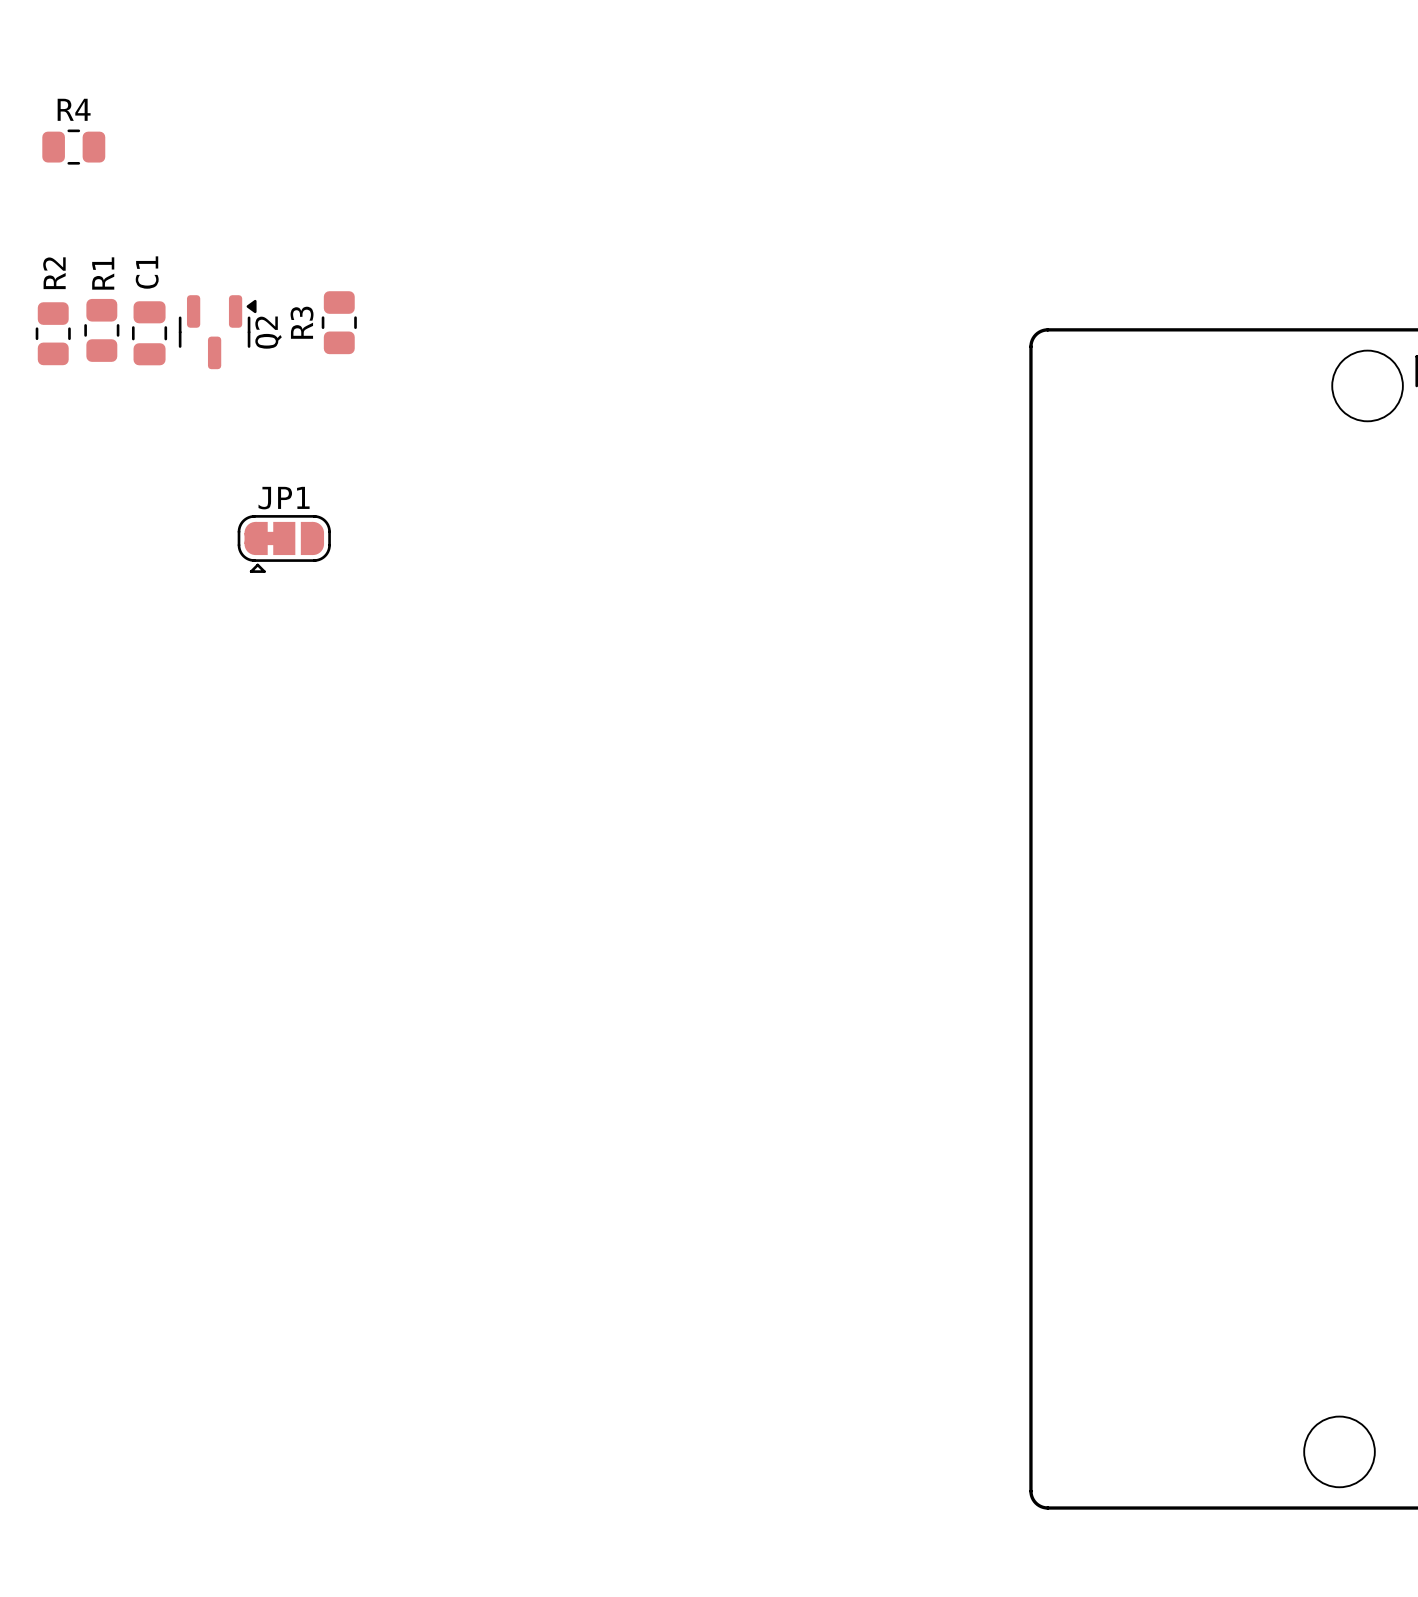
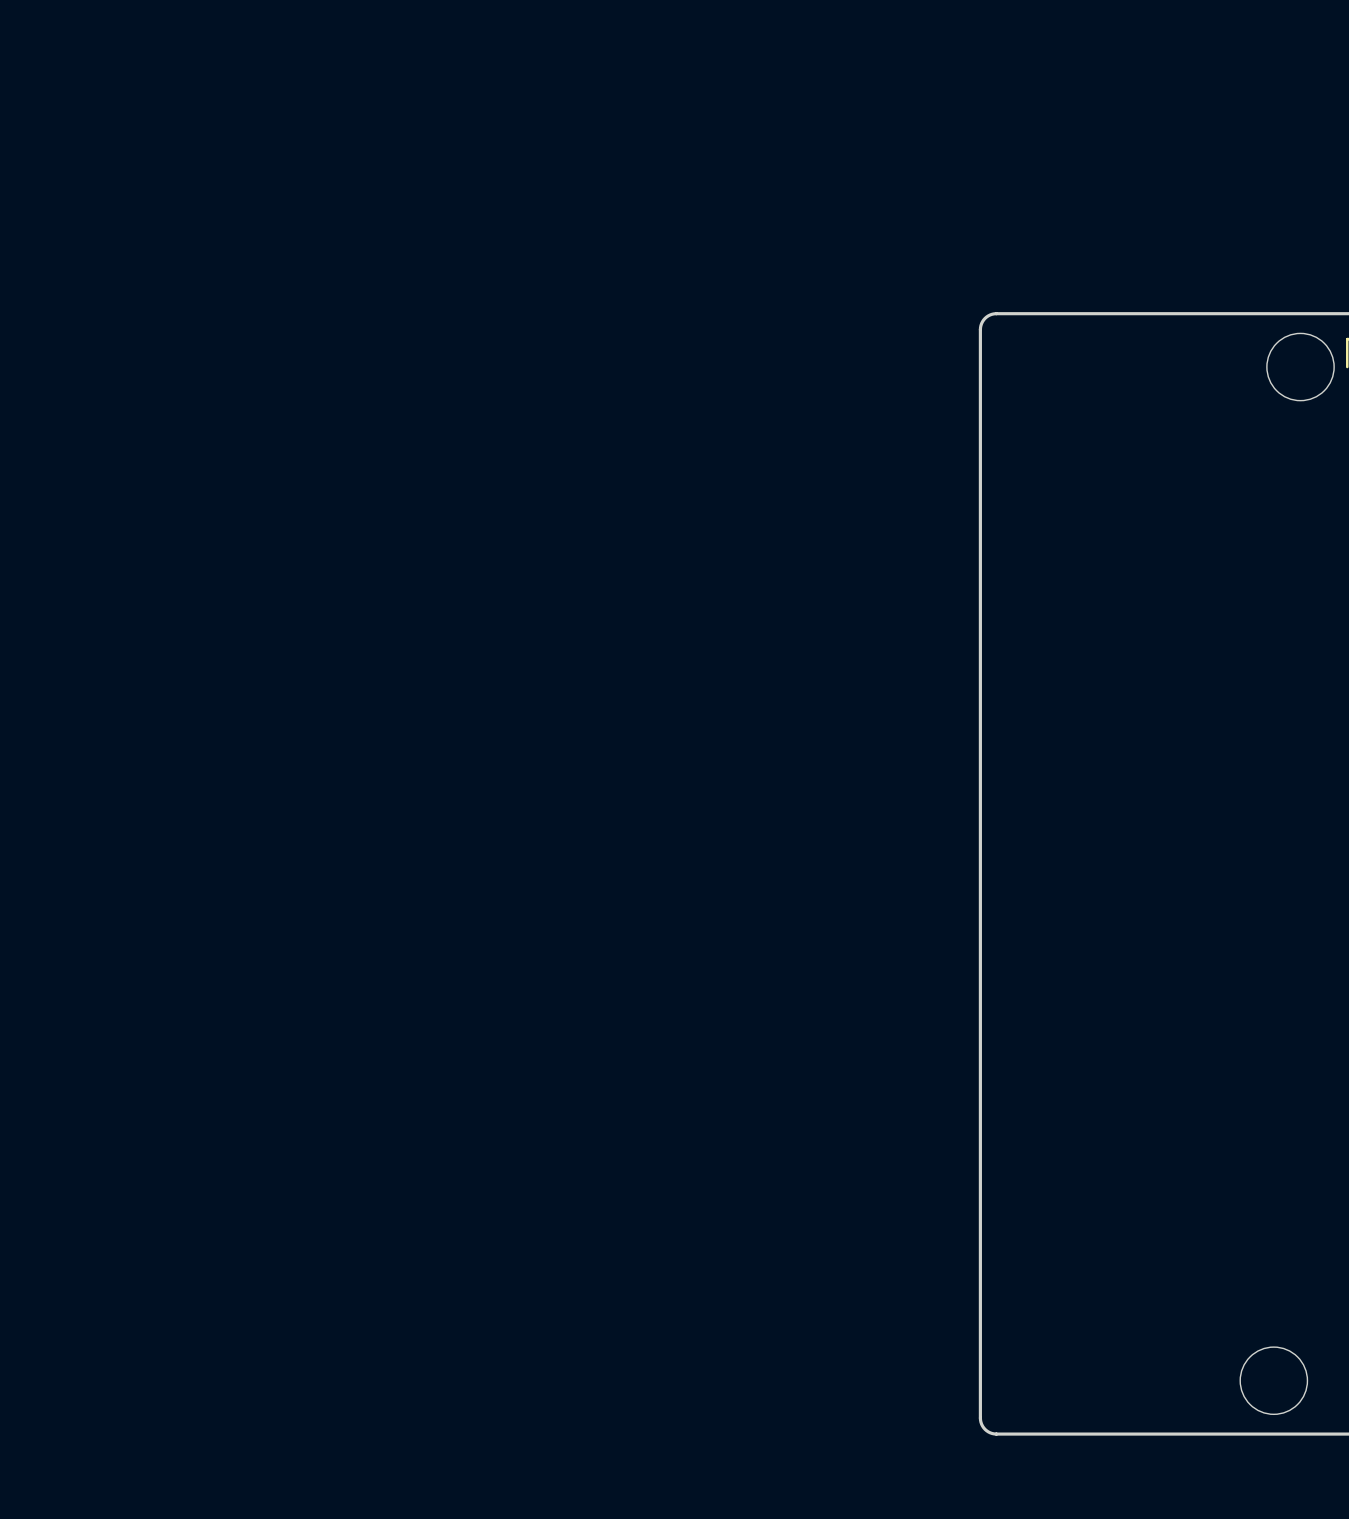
R4: (73, 147) -> none
R3: (339, 322) -> none
R1: (101, 330) -> none
Q2: (217, 332) -> none
R2: (53, 333) -> none
C1: (149, 333) -> none
JP1: (284, 544) -> none

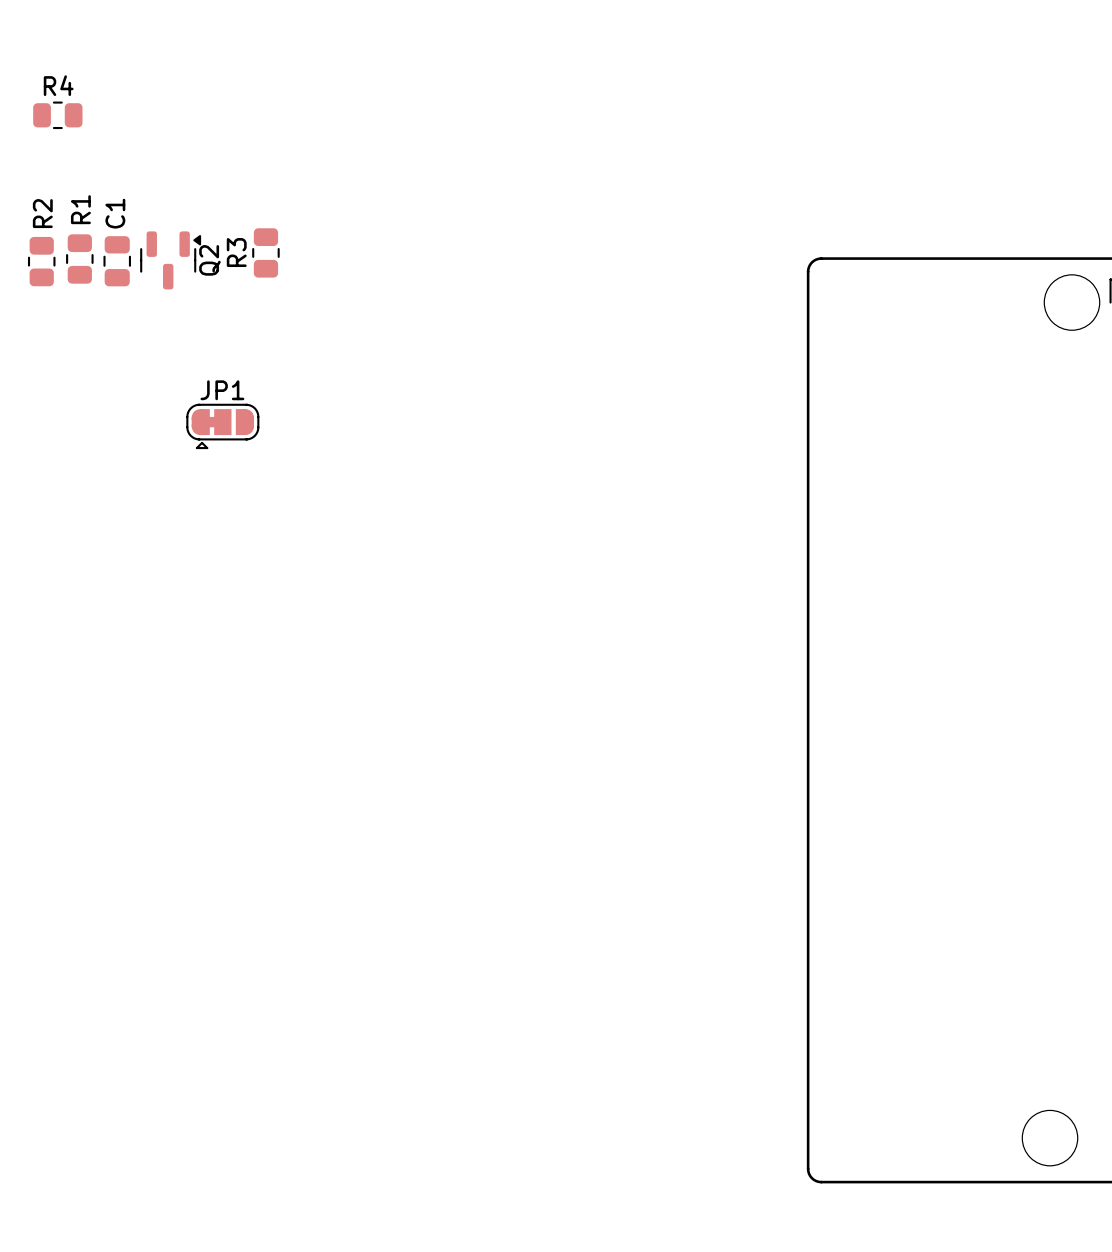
R4: none -> (57, 115)
R3: none -> (265, 252)
R1: none -> (79, 259)
Q2: none -> (170, 260)
C1: none -> (117, 261)
R2: none -> (41, 261)
JP1: none -> (222, 426)

